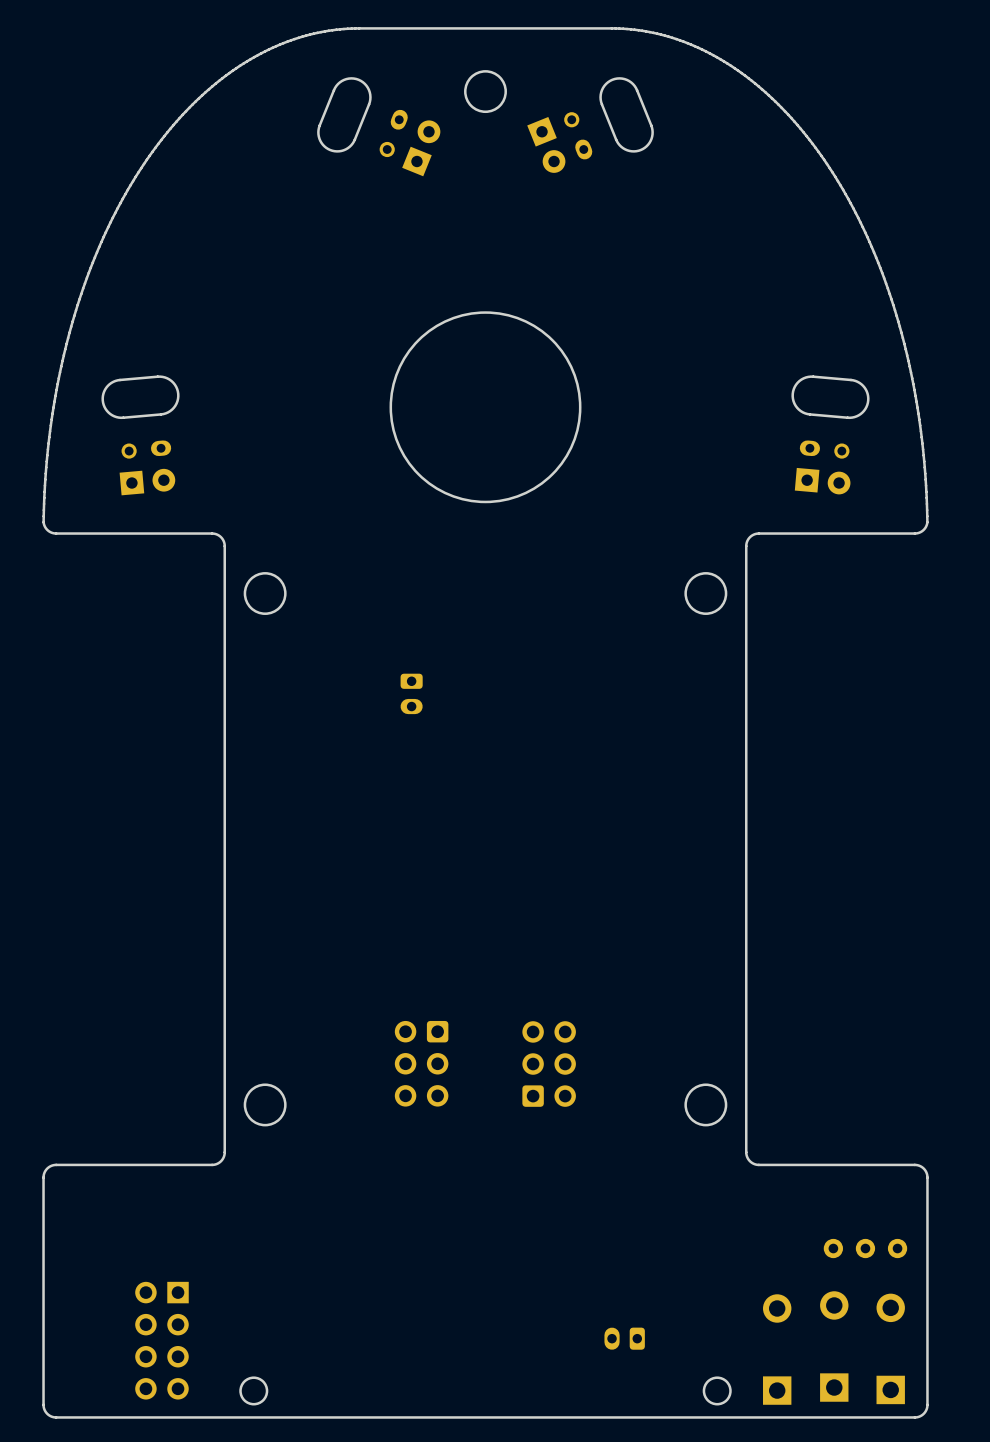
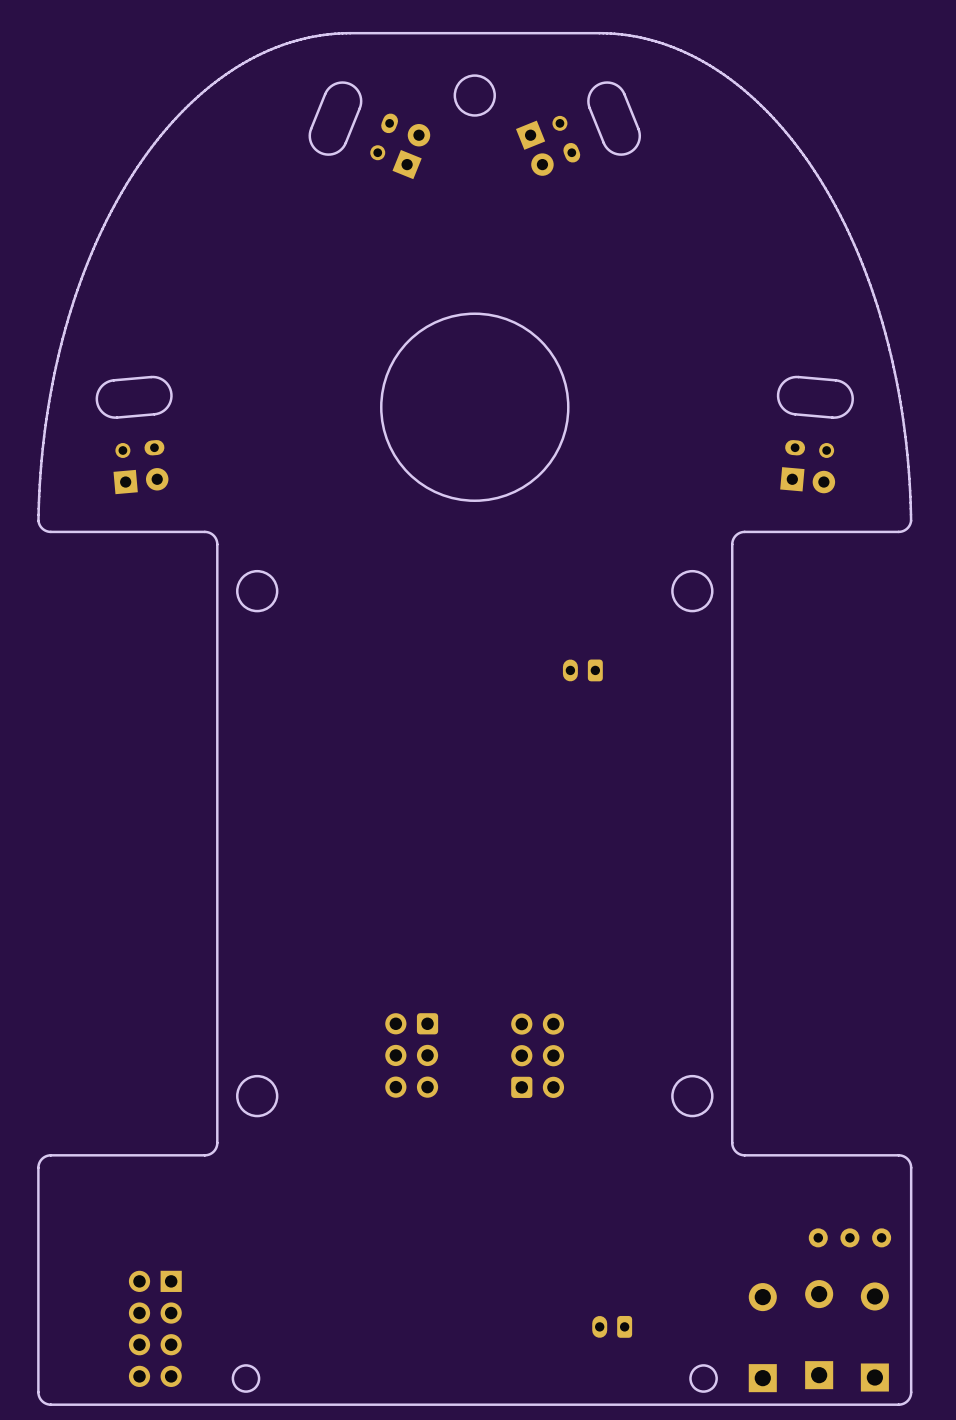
part rotation: 0° (411, 693) -> 90° clockwise (582, 670)
part position: (411, 693) -> (582, 670)

